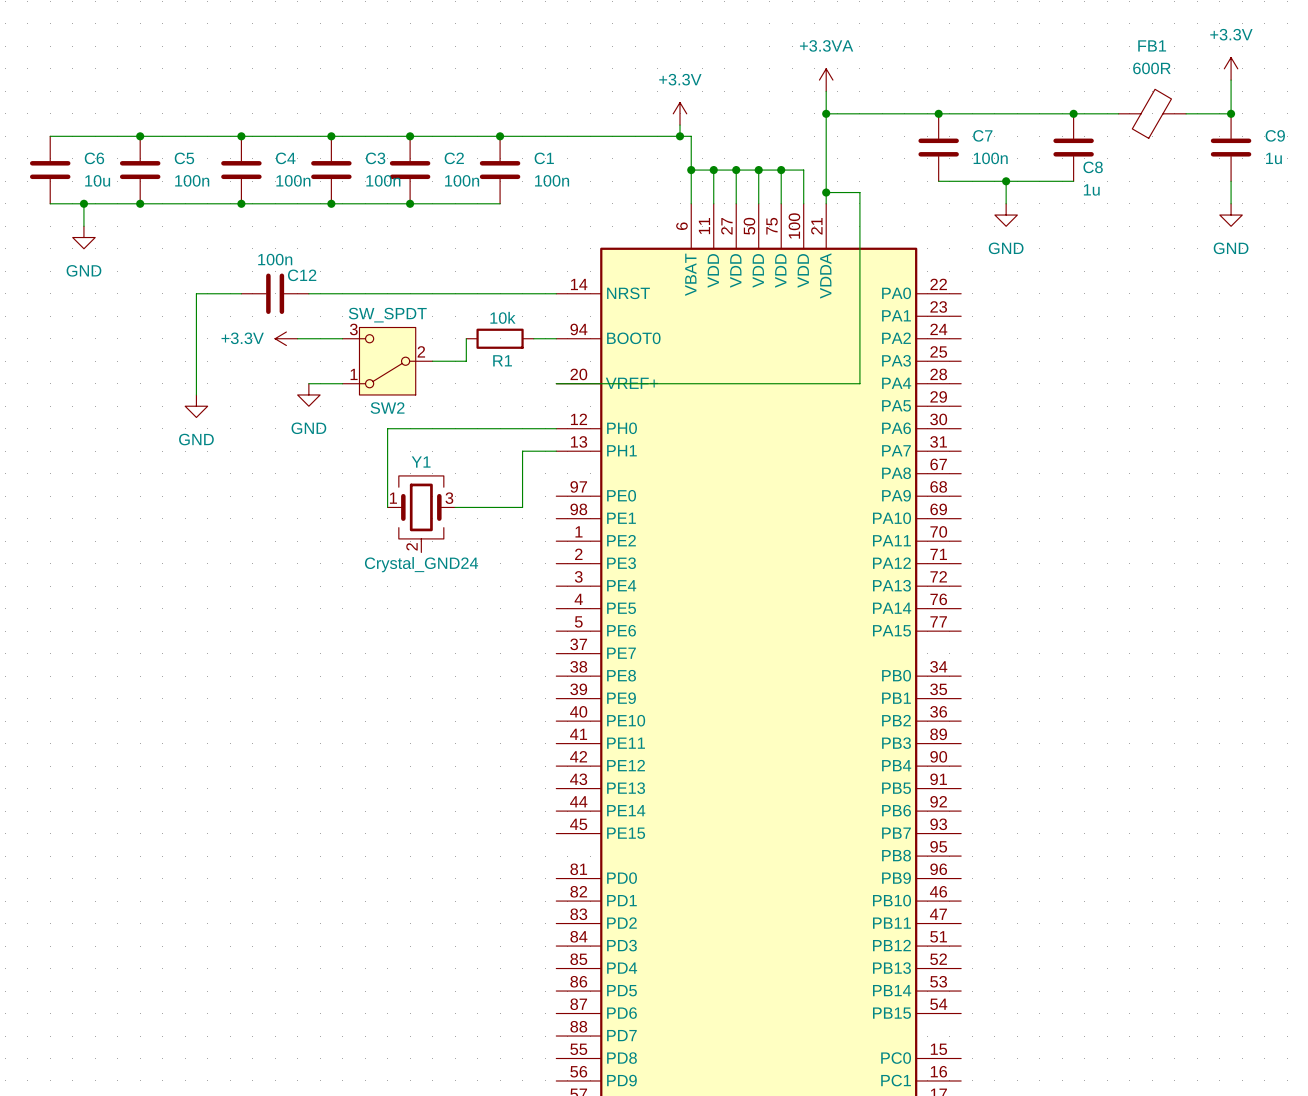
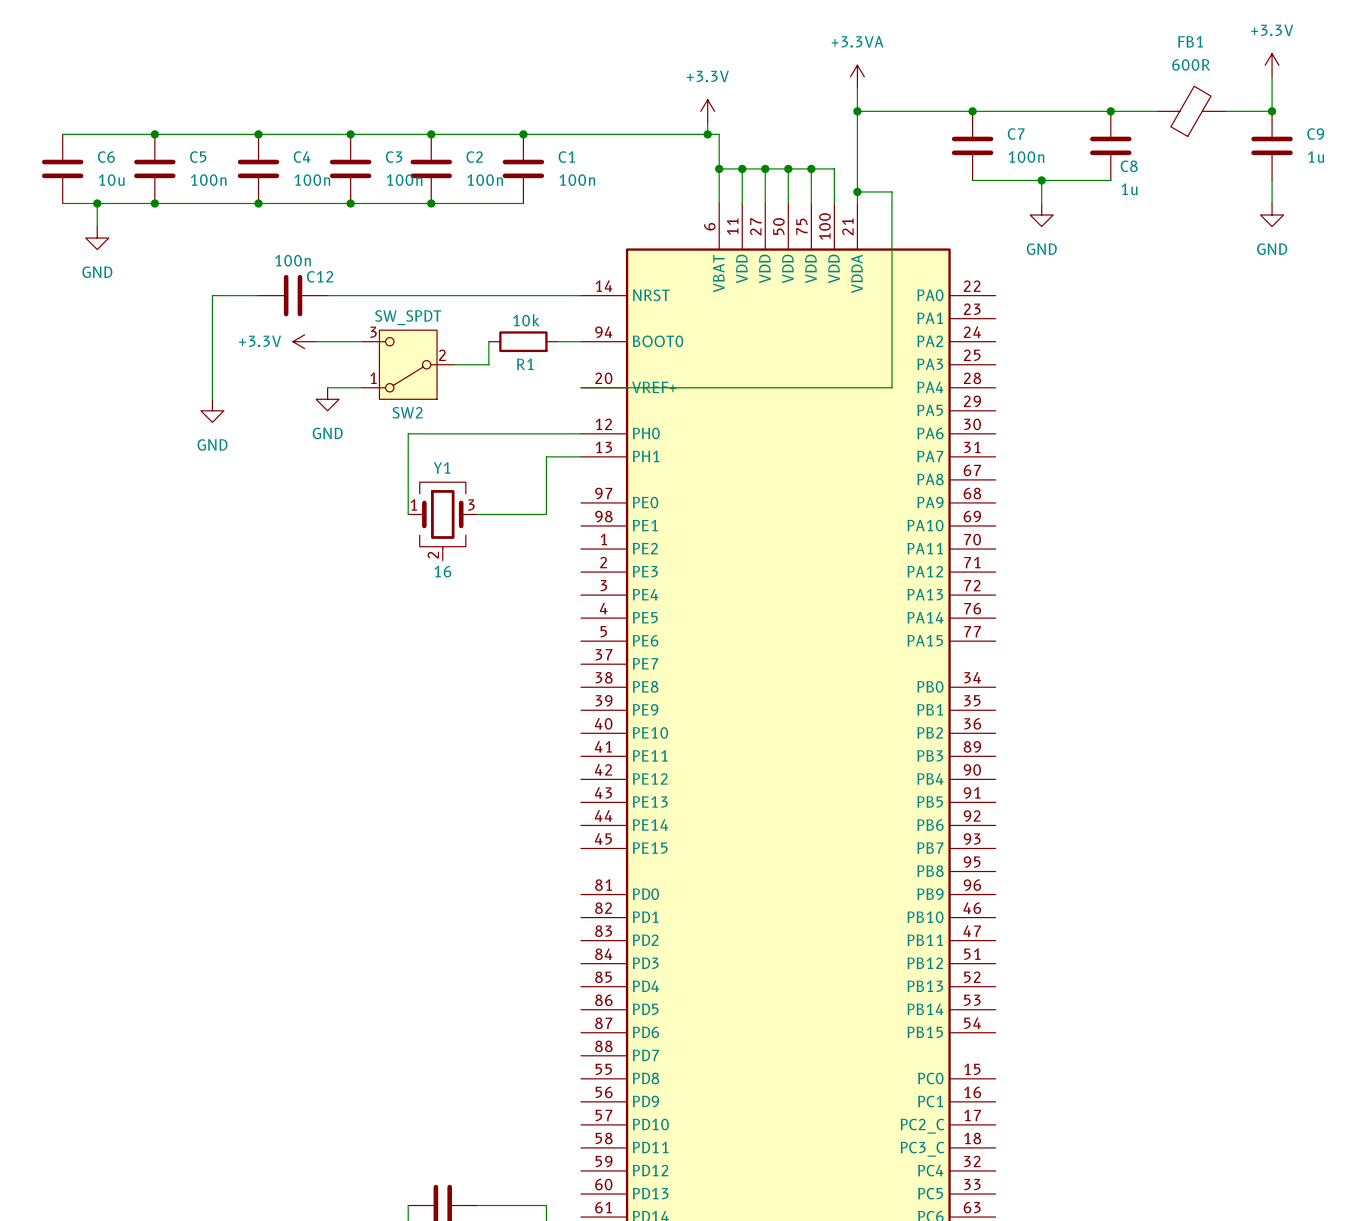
Y1 value: Crystal_GND24 (421, 564) -> 16 (442, 571)

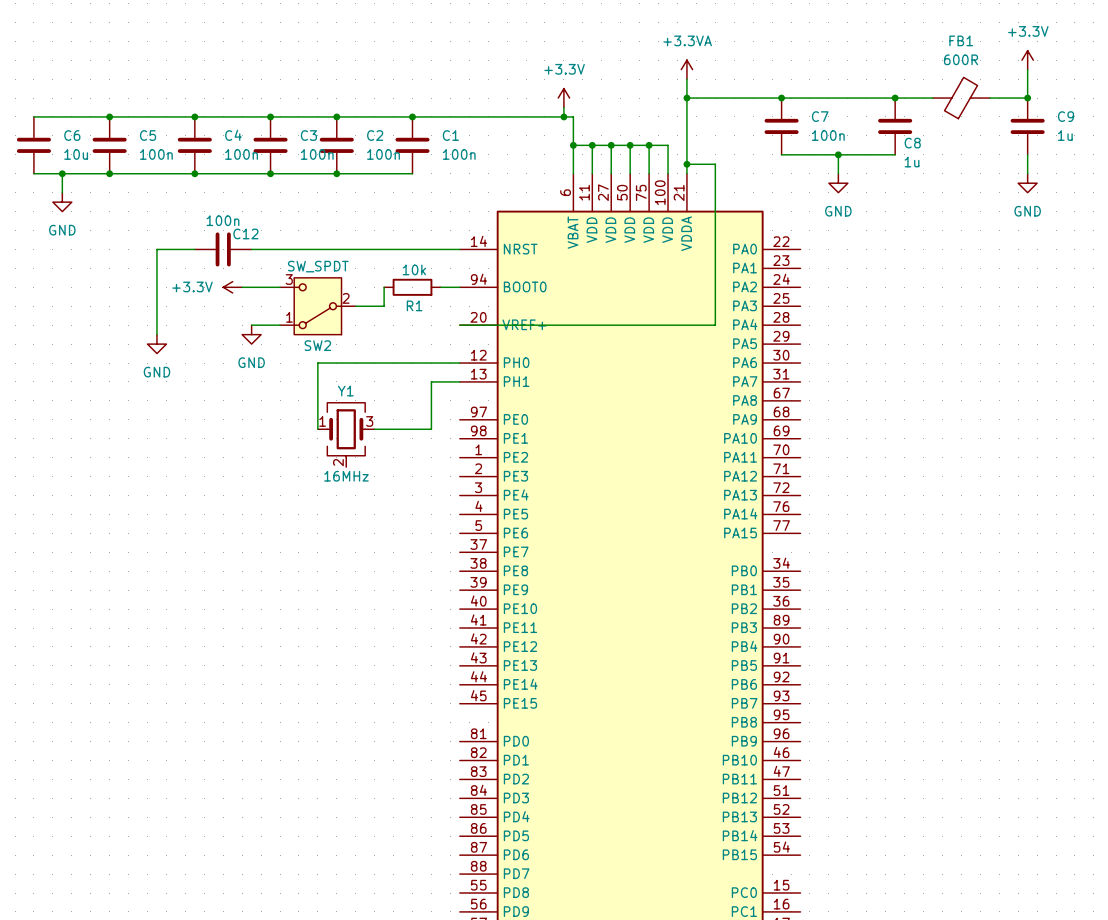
Y1 value: 16 (442, 571) -> 16MHz (346, 476)

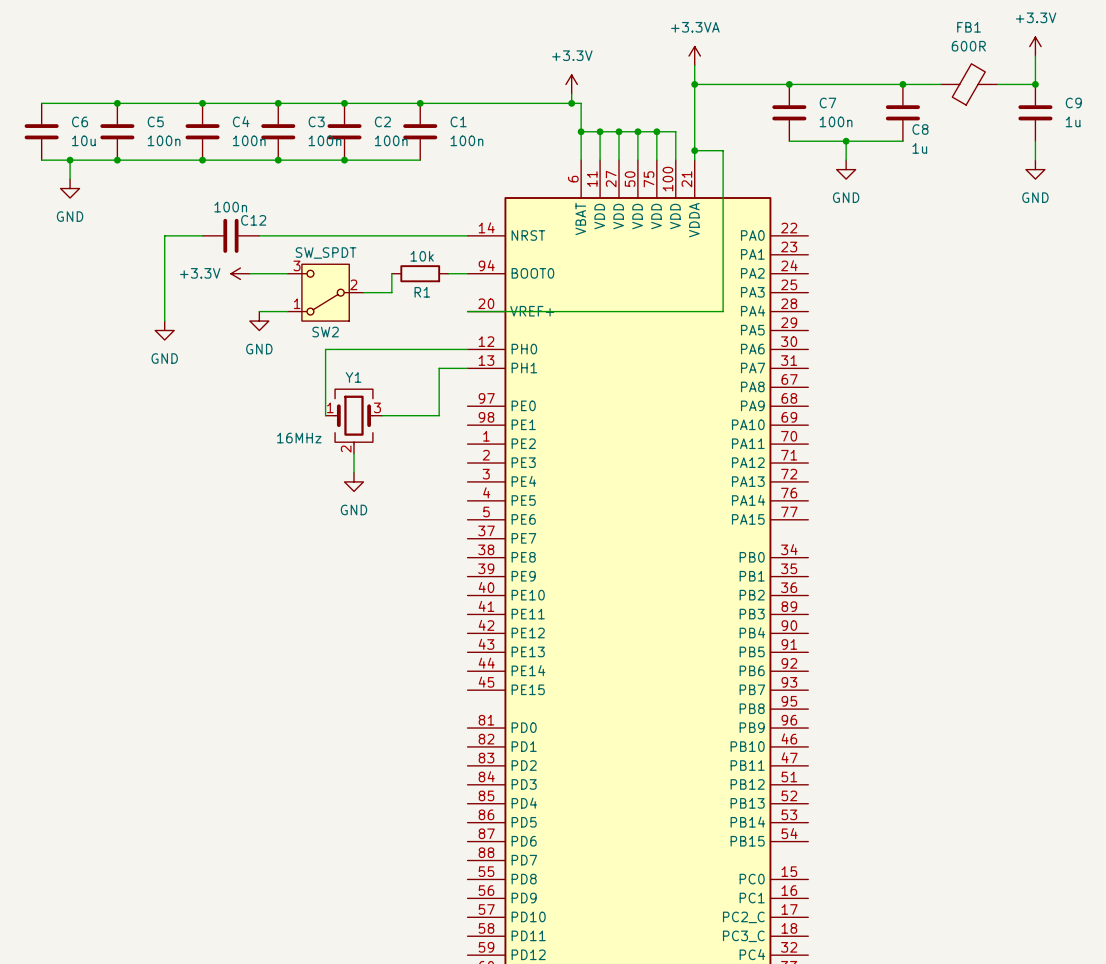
wire: none -> (353, 453) (353, 472)
Y1 value position: 16MHz (346, 476) -> 16MHz (299, 438)
power symbol: none -> GND (353, 481)

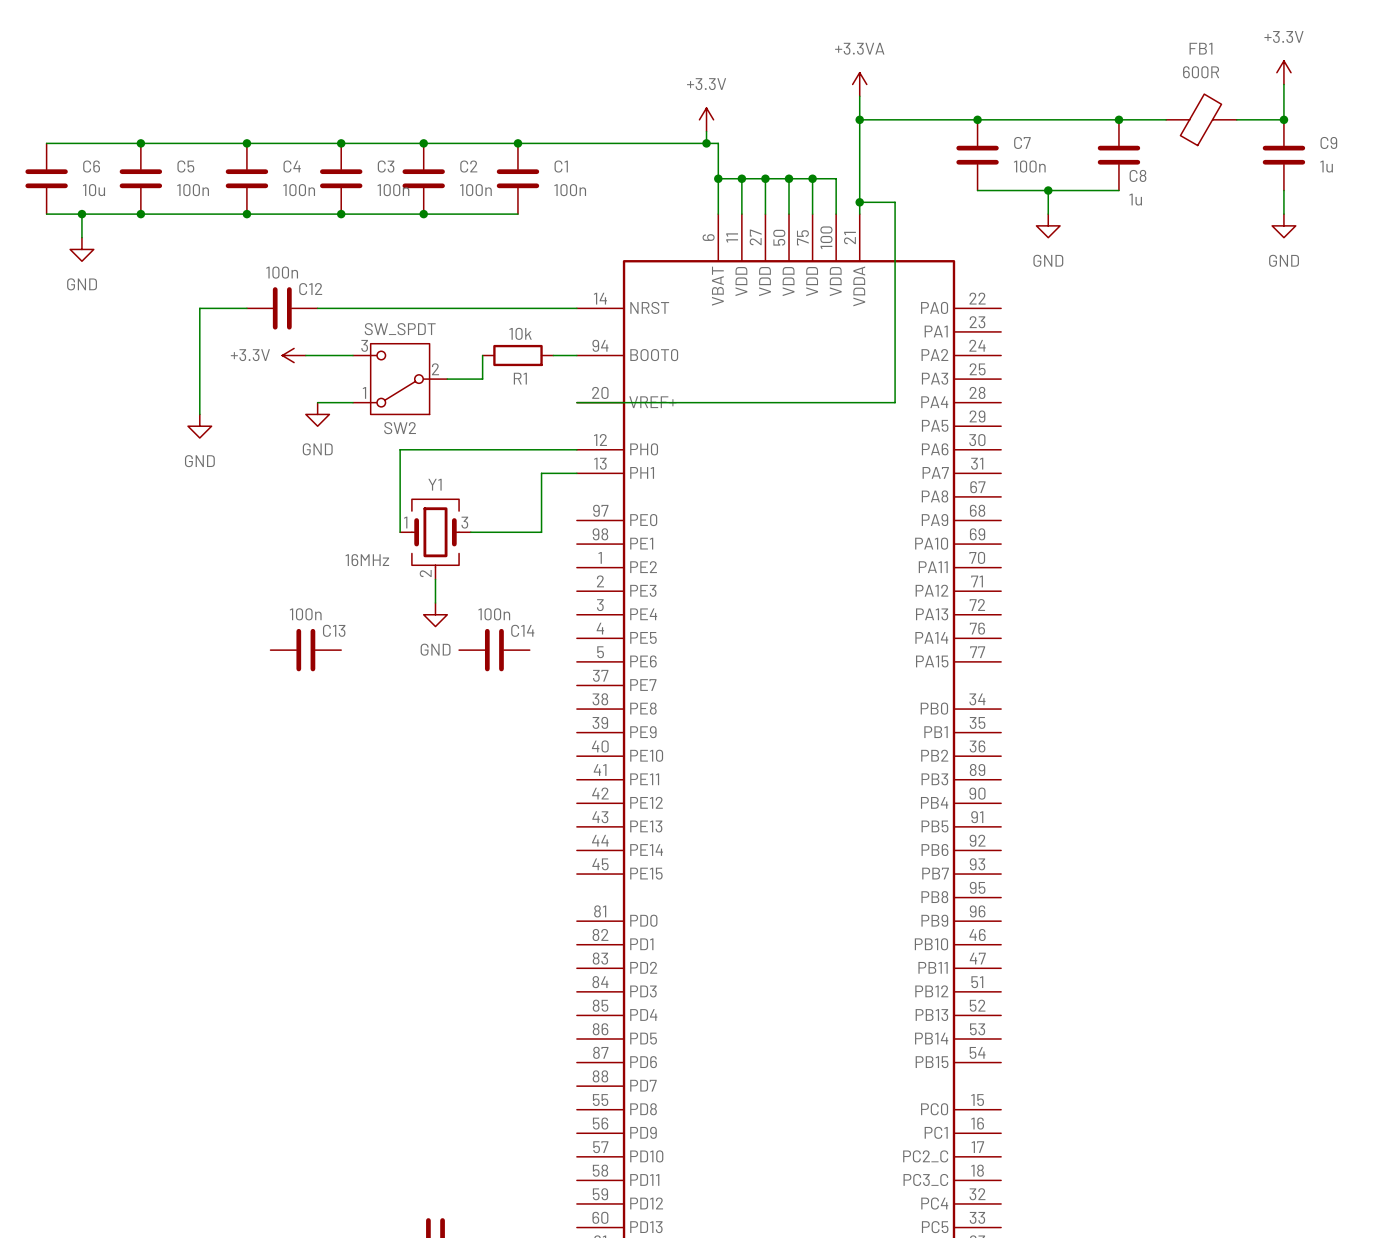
C13: none -> 100n (305, 650)
C14: none -> 100n (494, 650)

